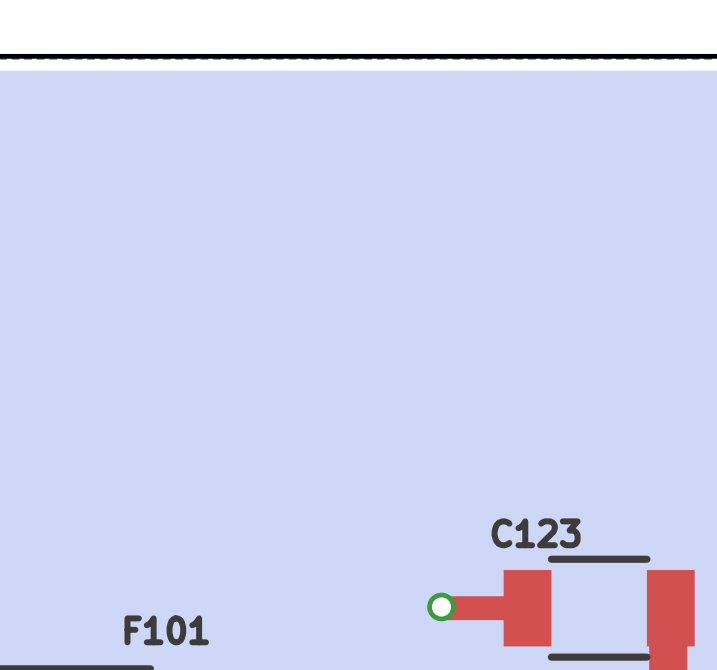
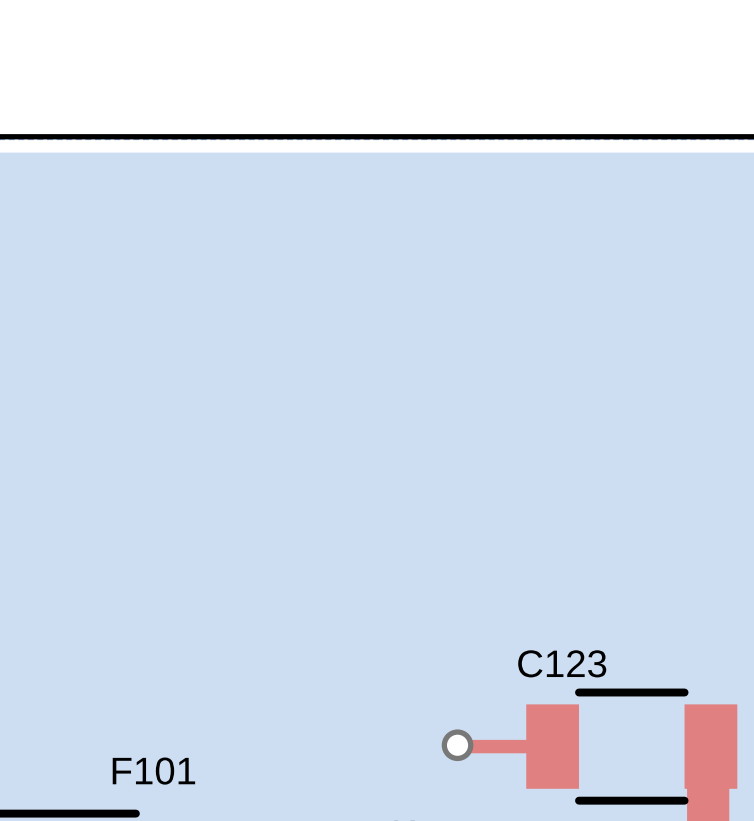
top track width: thick (442, 608) (527, 608) -> thin (458, 746) (552, 746)

